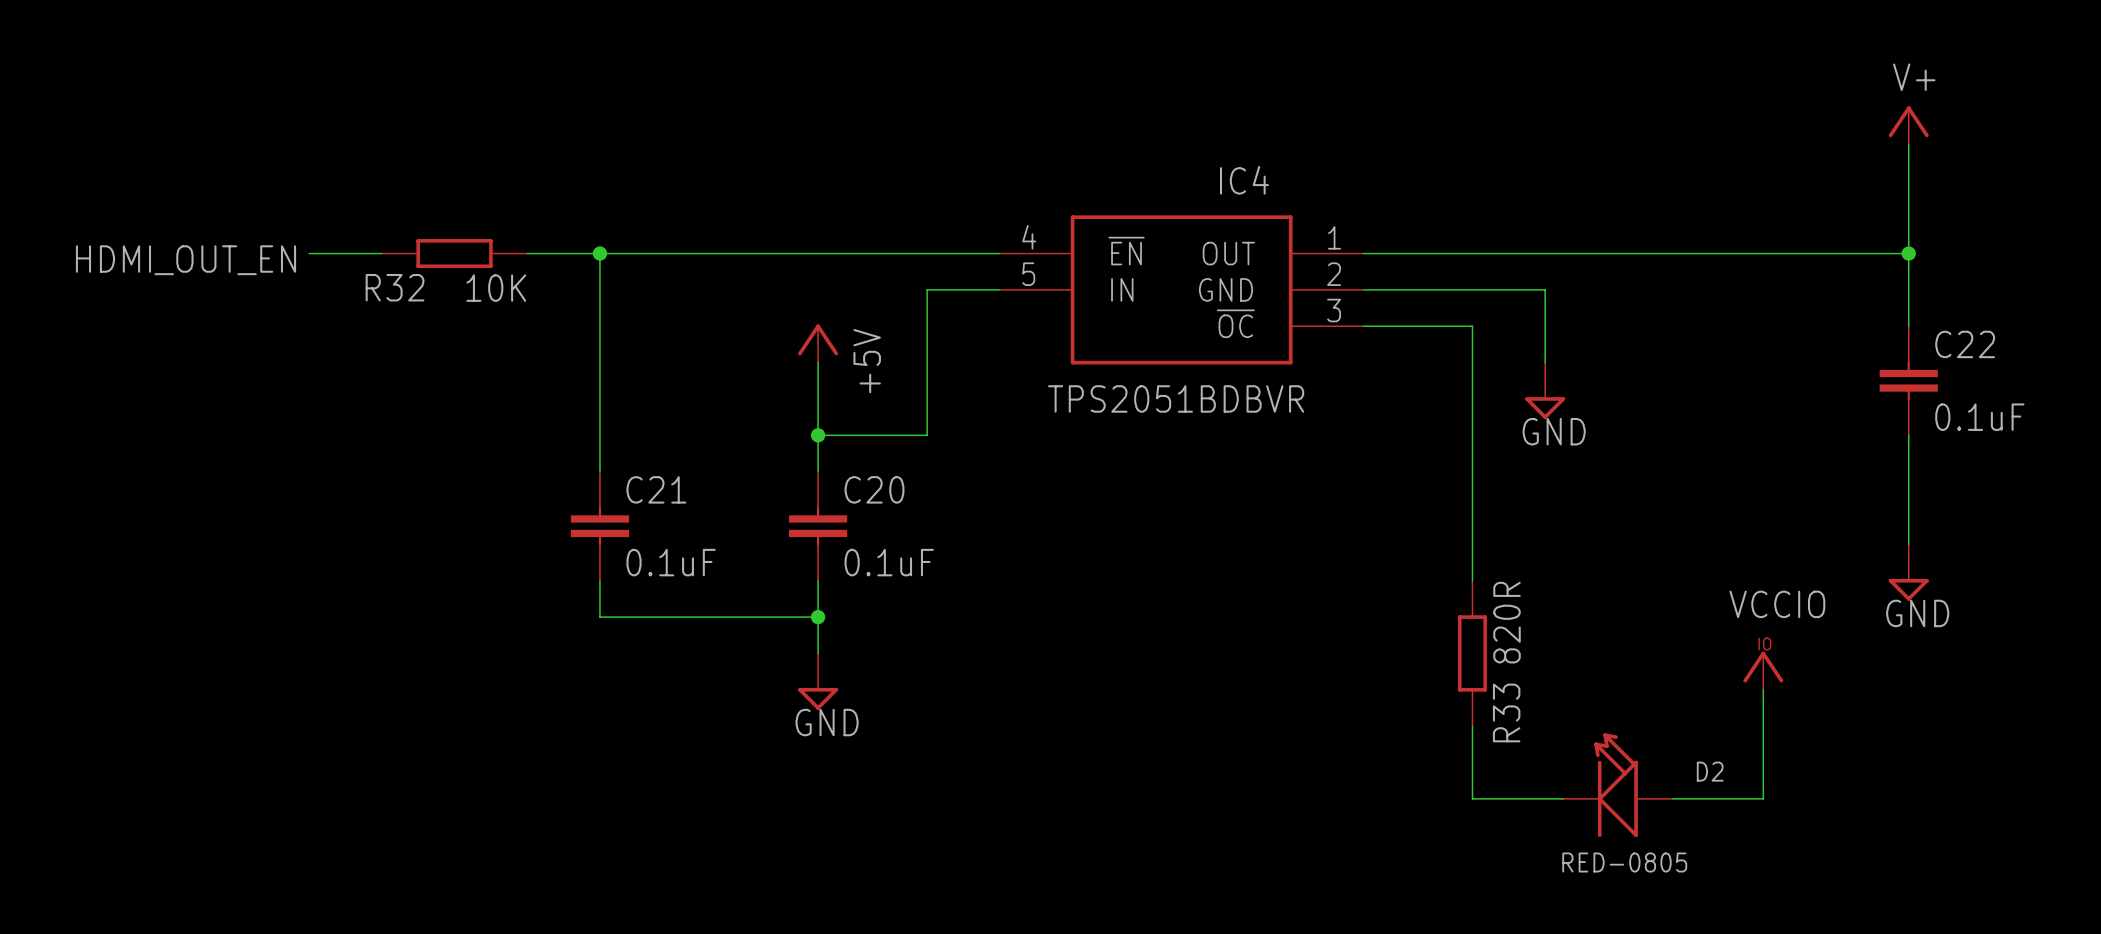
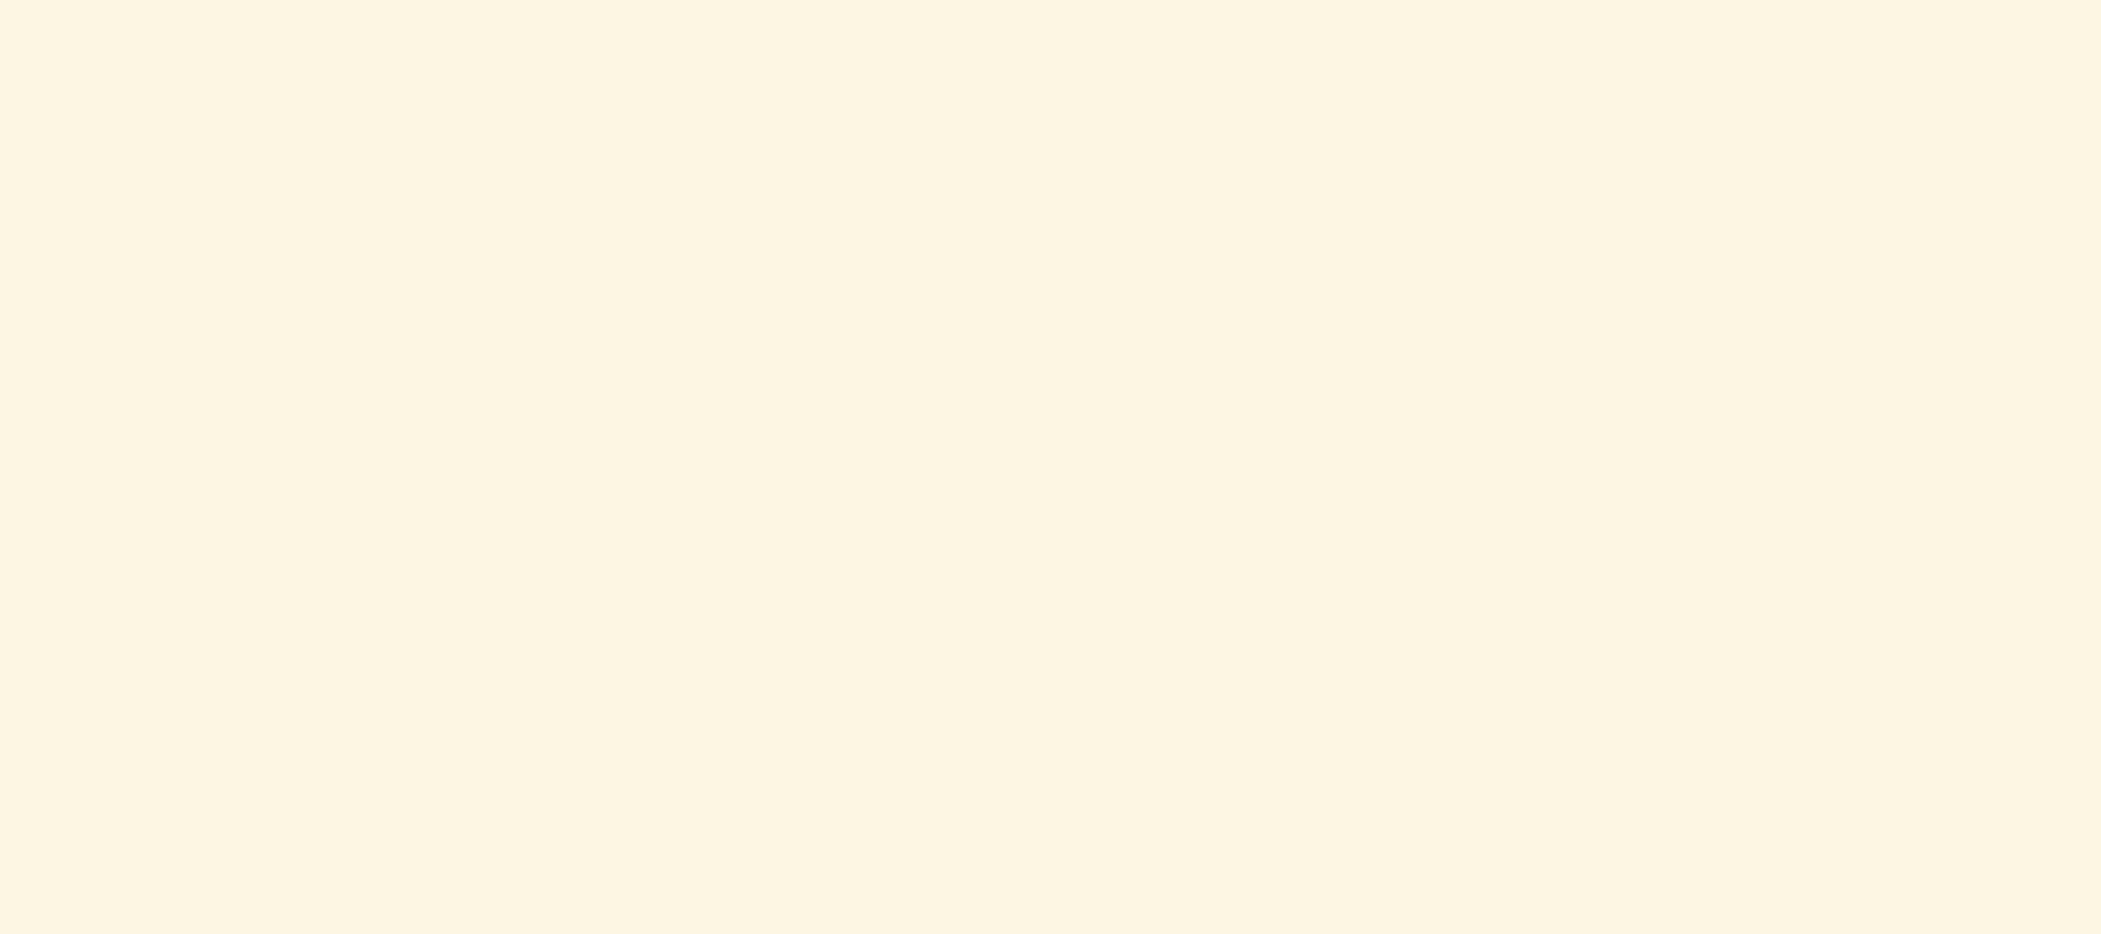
power symbol: V+ (1908, 125) -> none
wire: (1908, 144) (1908, 326) -> none
wire: (309, 253) (381, 253) -> none
R32: 10K (454, 253) -> none
wire: (527, 253) (999, 253) -> none
wire: (599, 253) (599, 471) -> none
junction: (599, 253) -> none
wire: (1363, 253) (1908, 253) -> none
junction: (1908, 253) -> none
label: HDMI_OUT_EN (185, 260) -> none
wire: (999, 289) (927, 289) (927, 435) (818, 435) -> none
IC4: TPS2051BDBVR (1181, 289) -> none
wire: (1363, 289) (1545, 289) (1545, 362) -> none
wire: (1363, 326) (1472, 326) (1472, 580) -> none
power symbol: +5V (818, 343) -> none
wire: (818, 362) (818, 471) -> none
C22: 0.1uF (1908, 380) -> none
power symbol: GND (1545, 390) -> none
junction: (818, 435) -> none
wire: (1908, 435) (1908, 544) -> none
C21: 0.1uF (599, 526) -> none
C20: 0.1uF (818, 526) -> none
power symbol: GND (1908, 572) -> none
wire: (599, 580) (599, 617) (818, 617) -> none
wire: (818, 580) (818, 653) -> none
junction: (818, 617) -> none
R33: 820R (1472, 653) -> none
power symbol: VCCIO (1763, 670) -> none
power symbol: GND (818, 681) -> none
wire: (1763, 689) (1763, 798) (1672, 798) -> none
wire: (1472, 726) (1472, 798) (1563, 798) -> none
D2: RED-0805 (1617, 785) -> none

